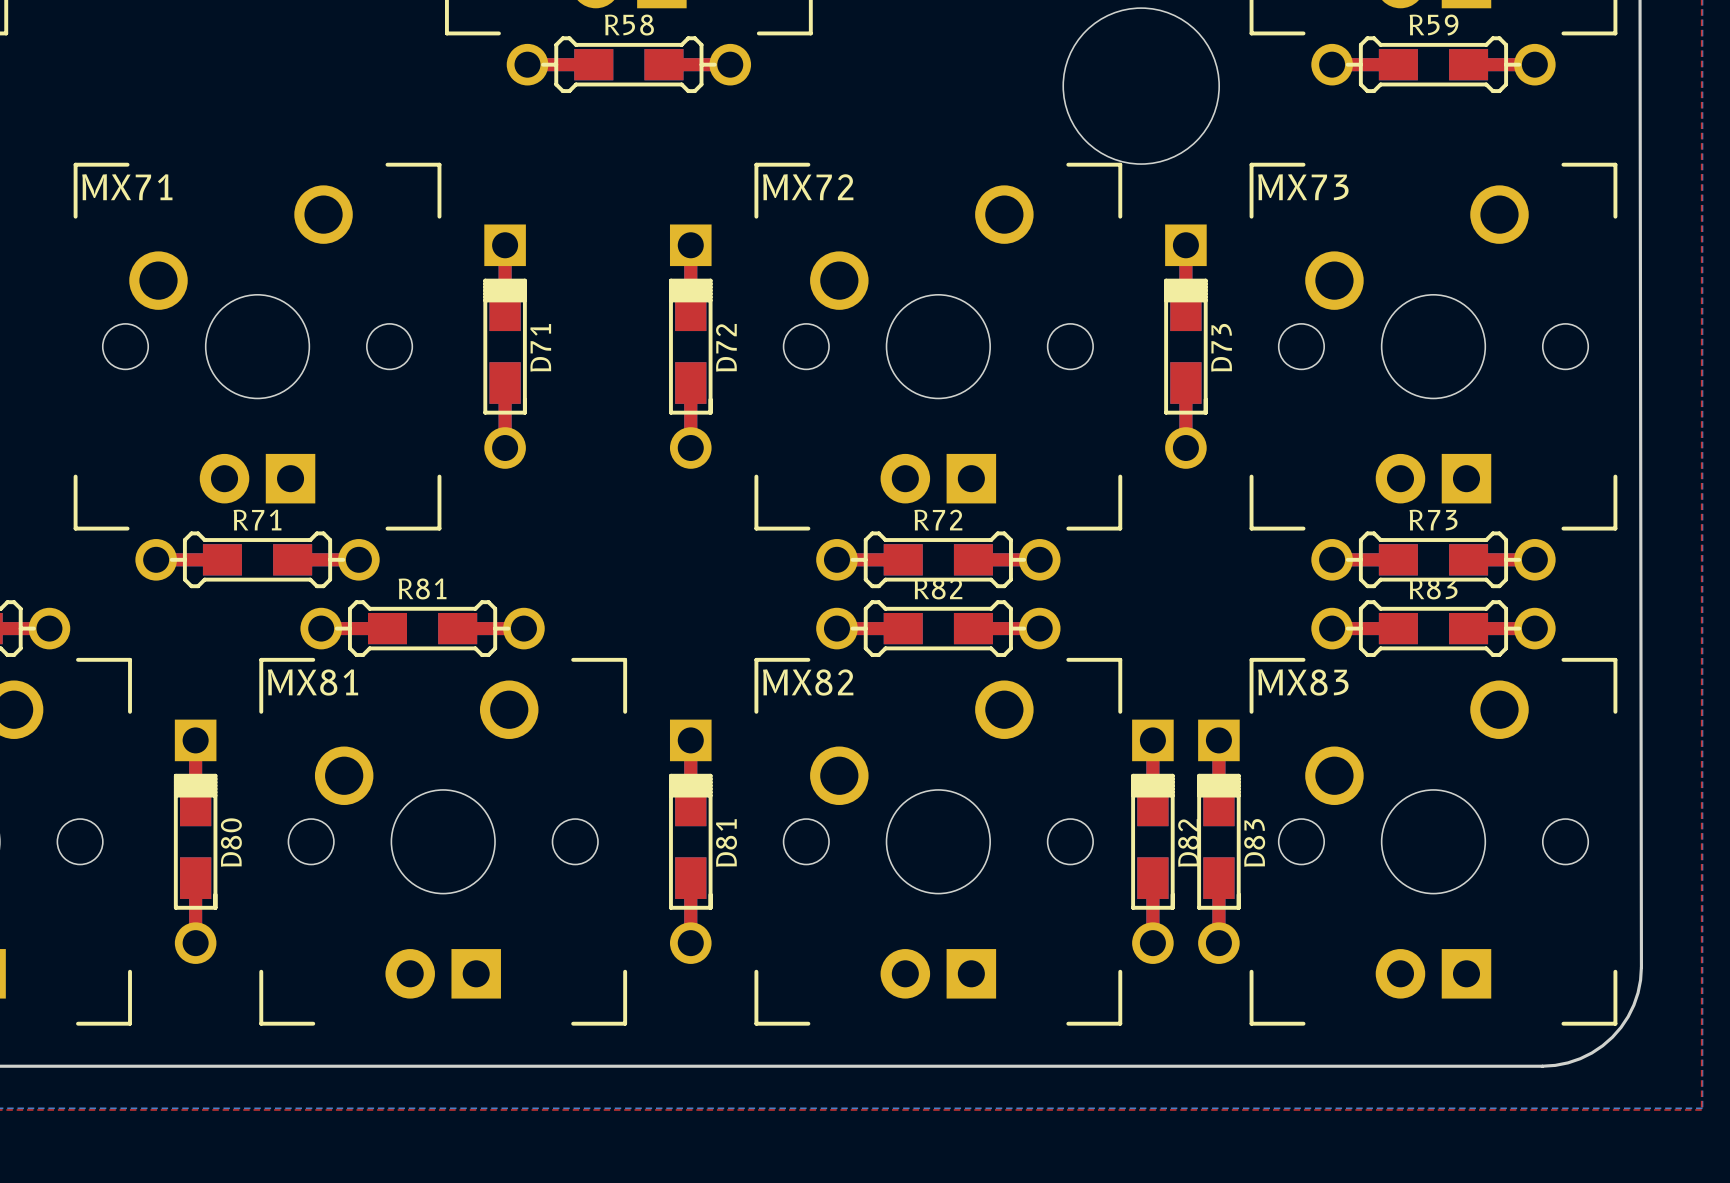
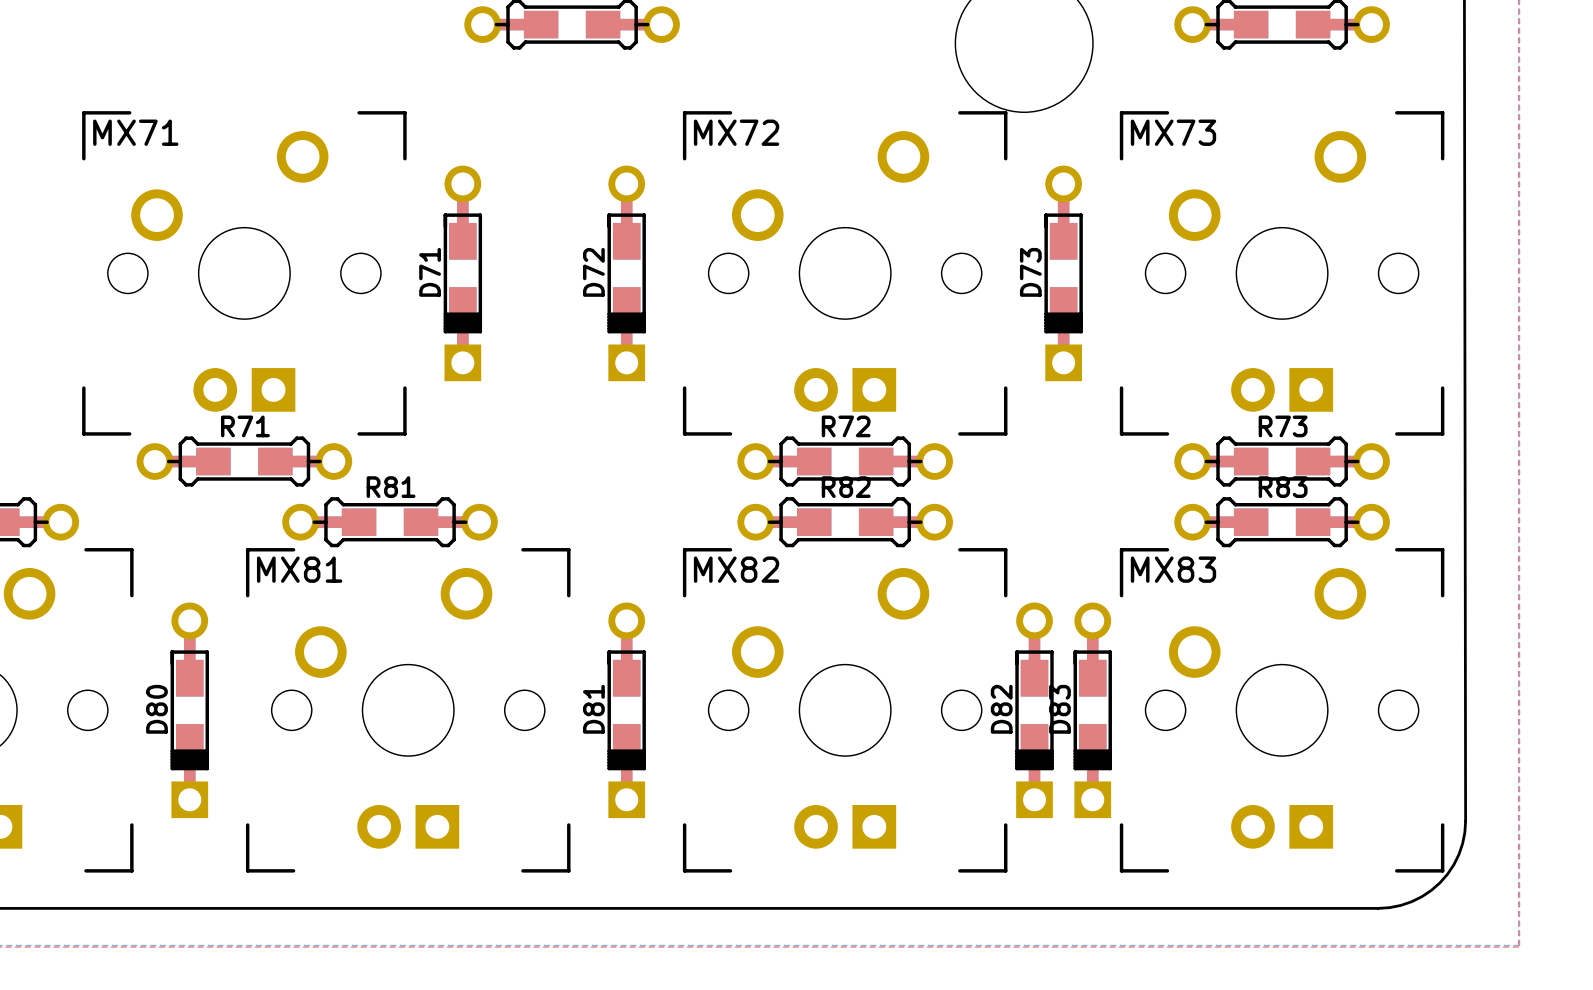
D71 rotation: 0° (505, 346) -> 180° (462, 273)
D72 rotation: 0° (690, 346) -> 180° (626, 273)
D73 rotation: 0° (1185, 346) -> 180° (1063, 273)
D80 rotation: 0° (195, 841) -> 180° (189, 710)
D81 rotation: 0° (690, 841) -> 180° (626, 710)
D82 rotation: 0° (1152, 841) -> 180° (1034, 710)
D83 rotation: 0° (1218, 841) -> 180° (1092, 710)

